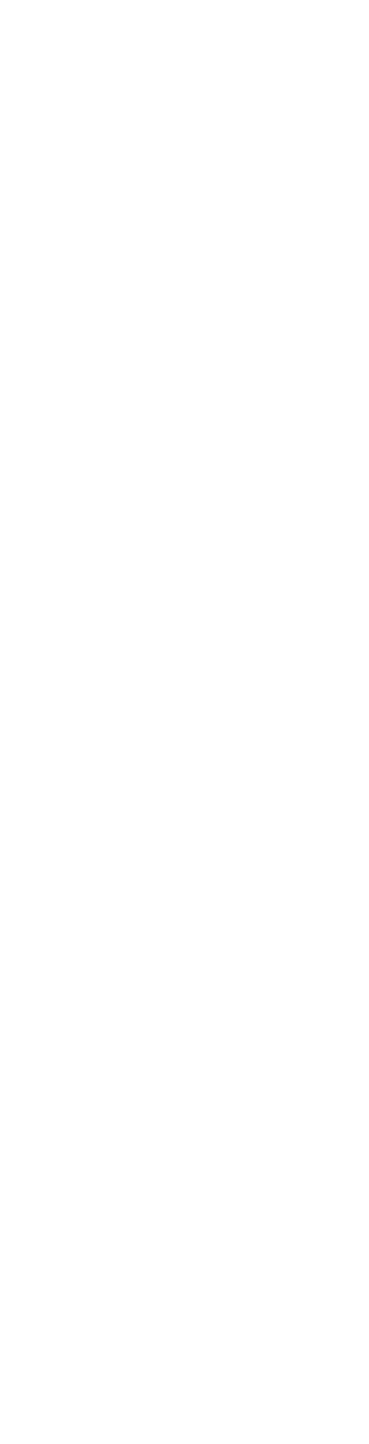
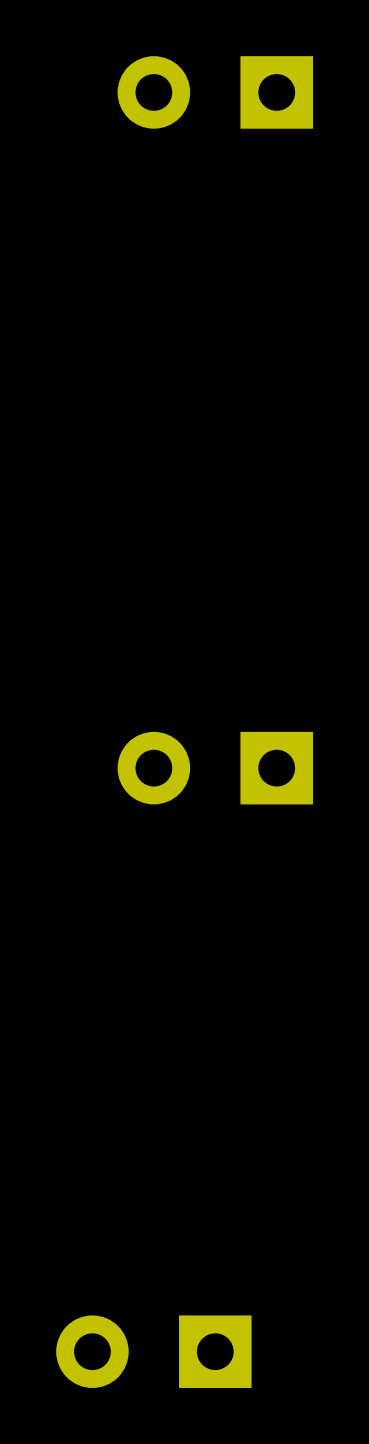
part: none -> (215, 92)
part: none -> (215, 768)
part: none -> (153, 1351)

